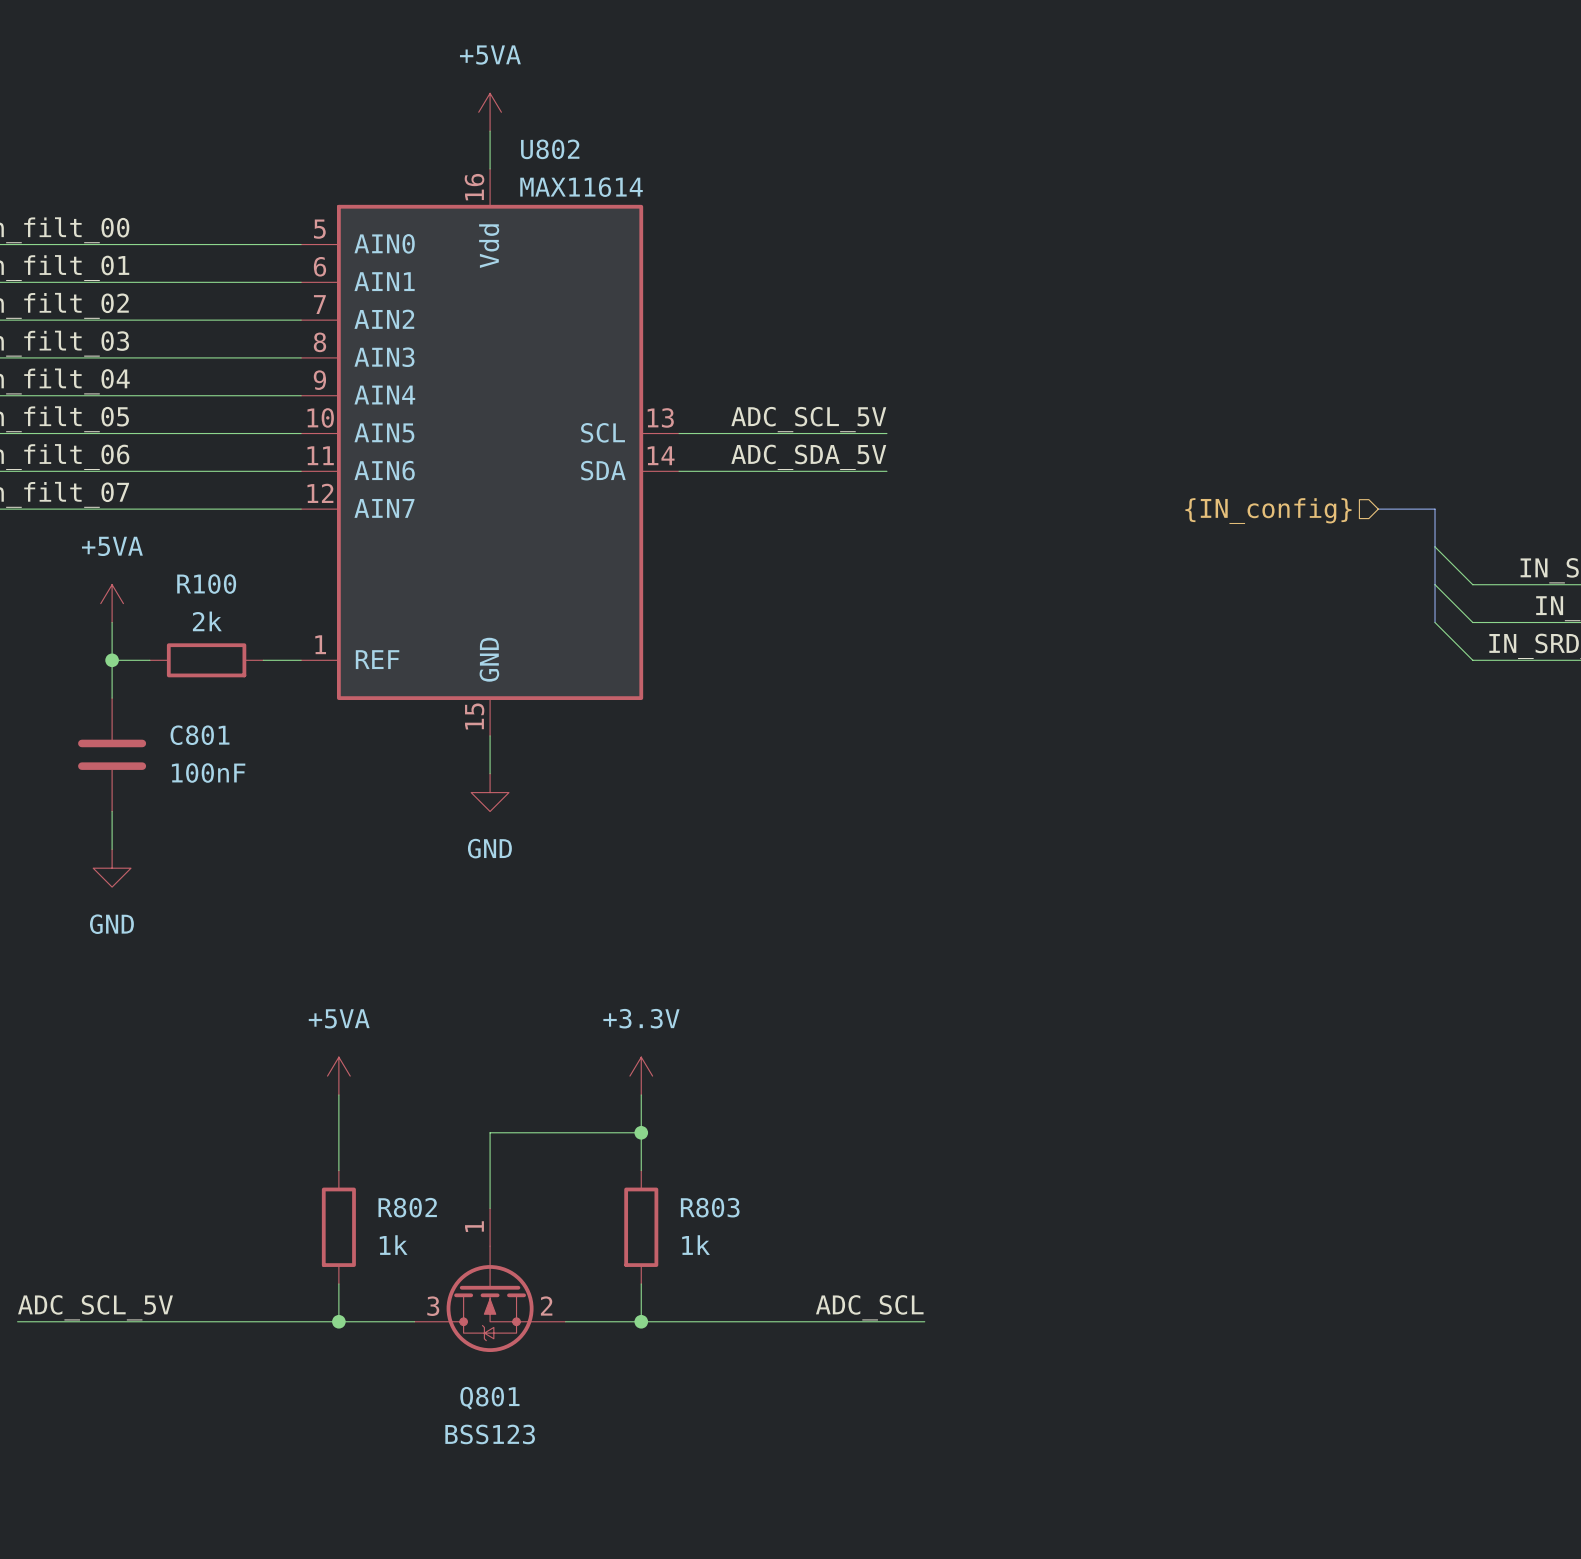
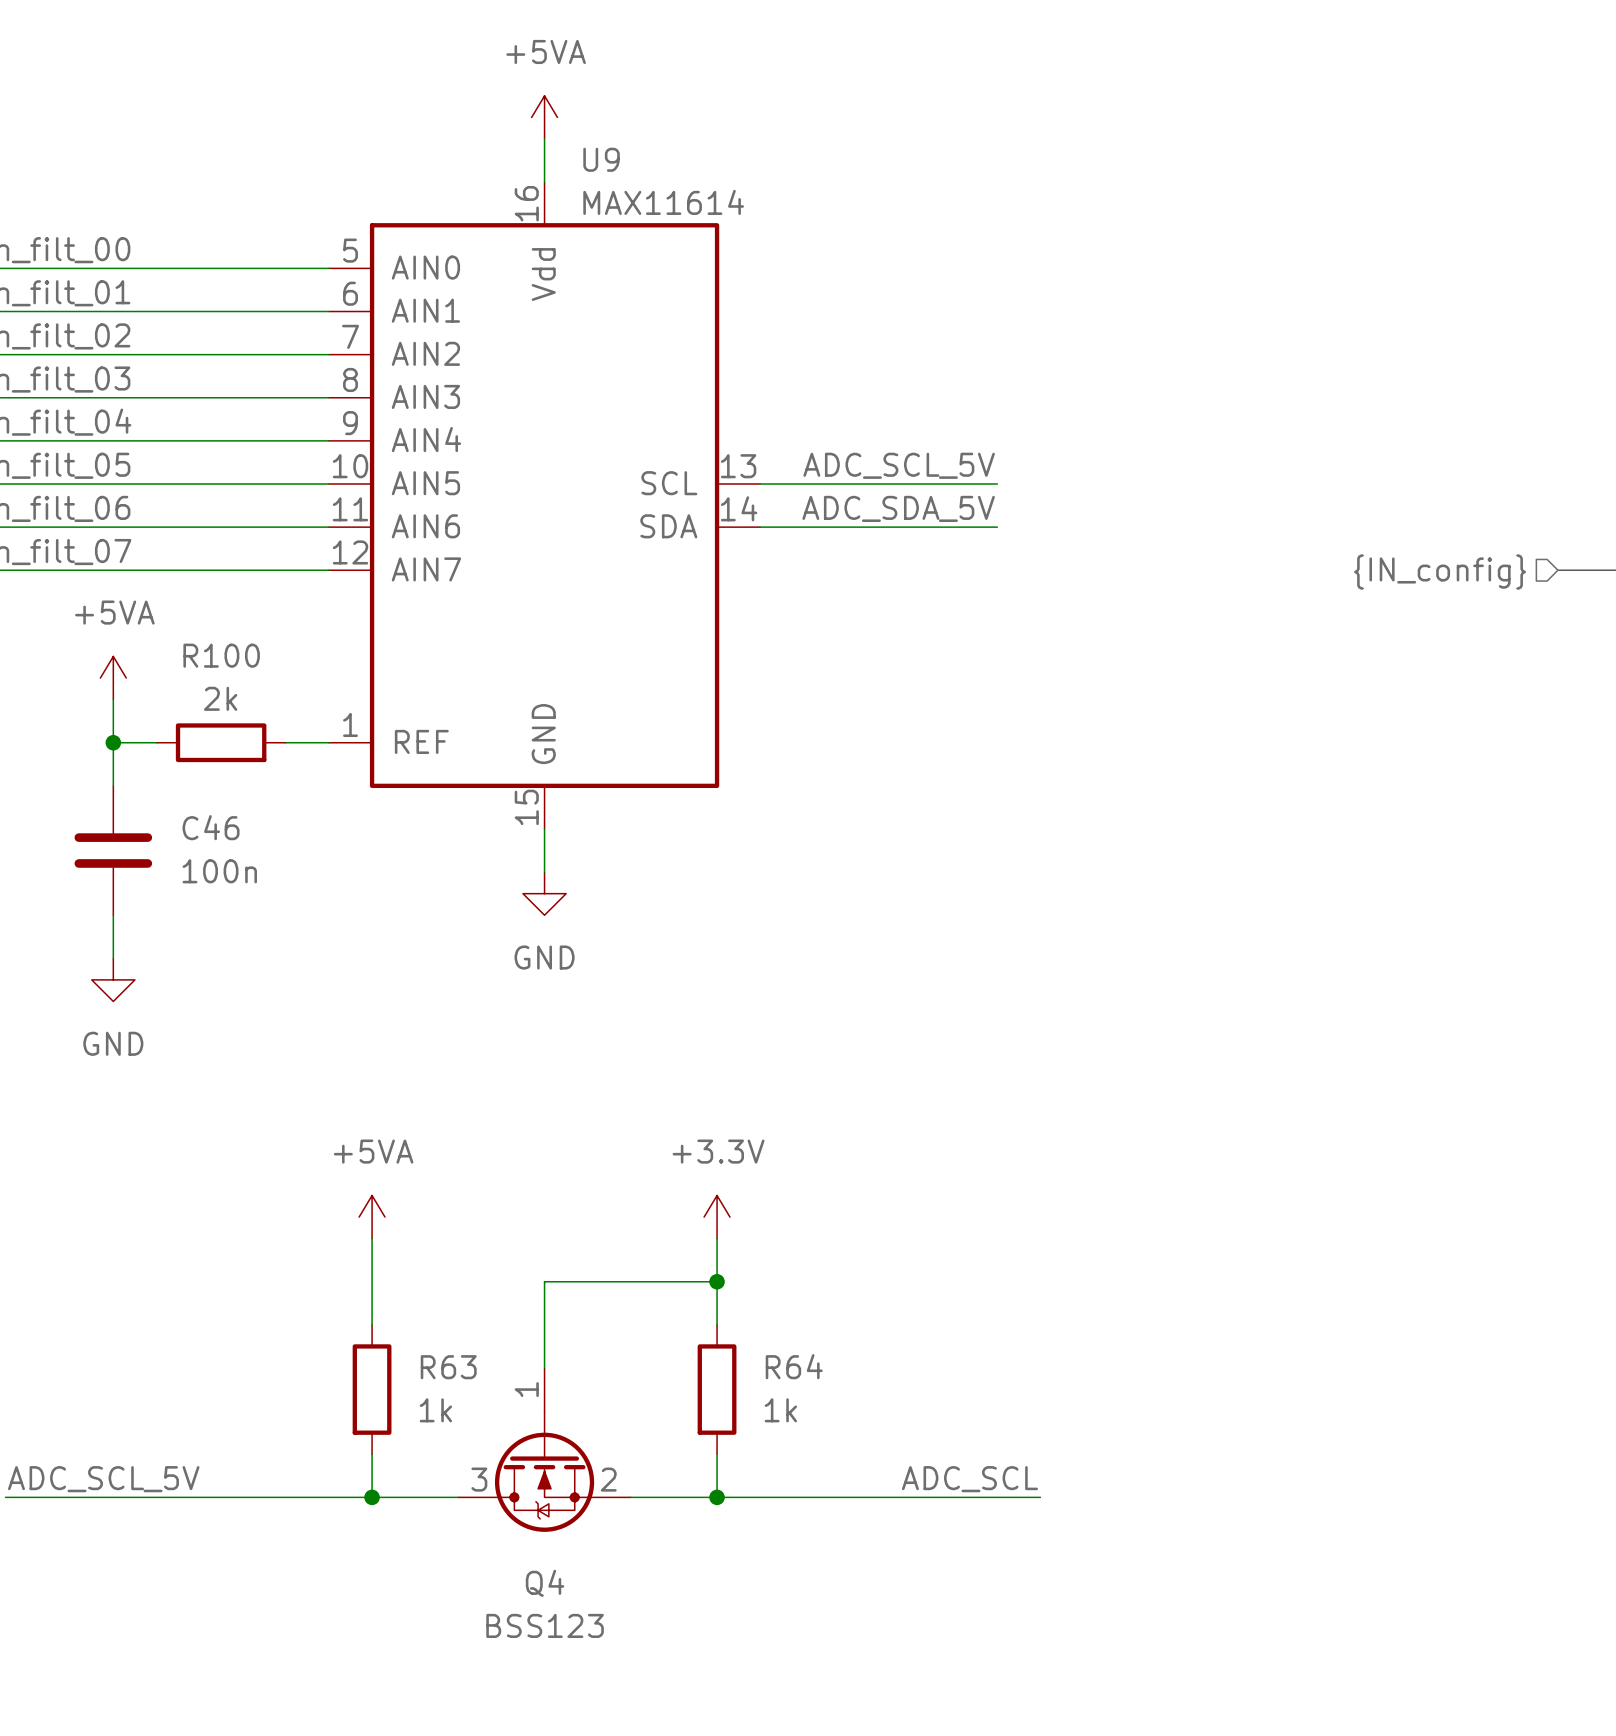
U802 name: U802 (550, 149) -> U9 (601, 159)
C801 name: C801 (200, 735) -> C46 (211, 827)
C801 value: 100nF (208, 773) -> 100n (219, 871)
R802 name: R802 (407, 1207) -> R63 (448, 1367)
R803 name: R803 (710, 1207) -> R64 (794, 1366)
Q801 name: Q801 (489, 1398) -> Q4 (545, 1583)

